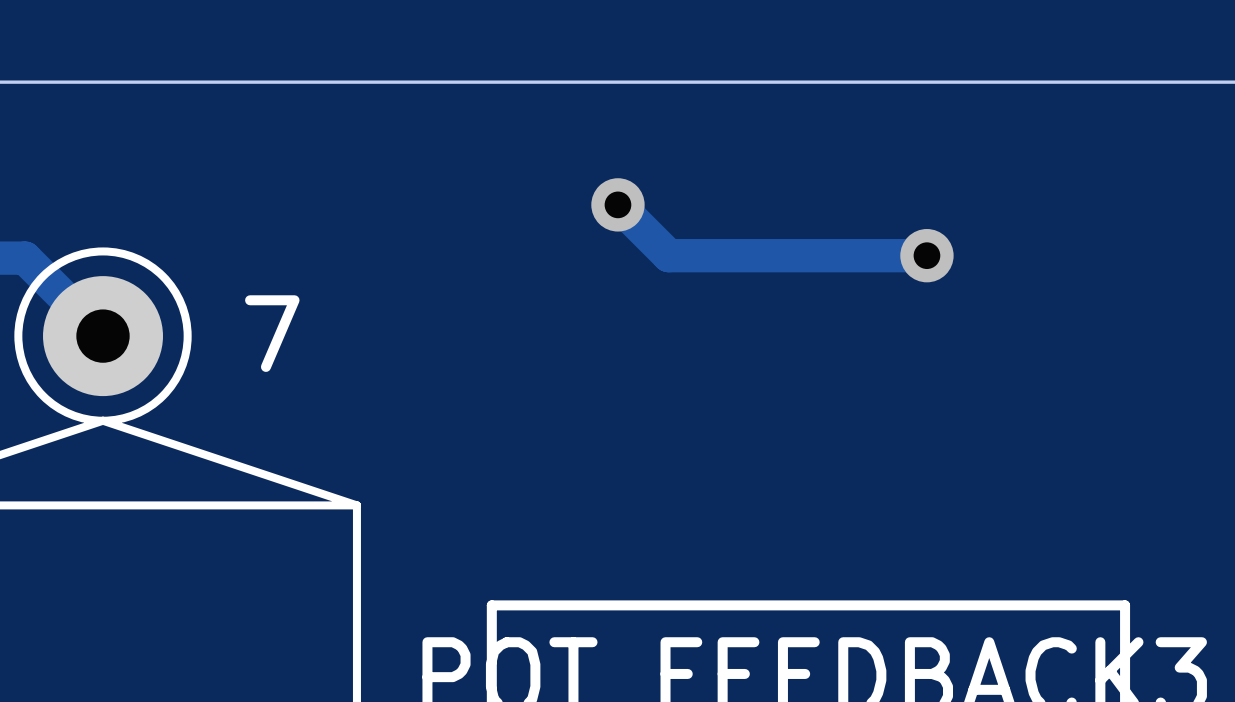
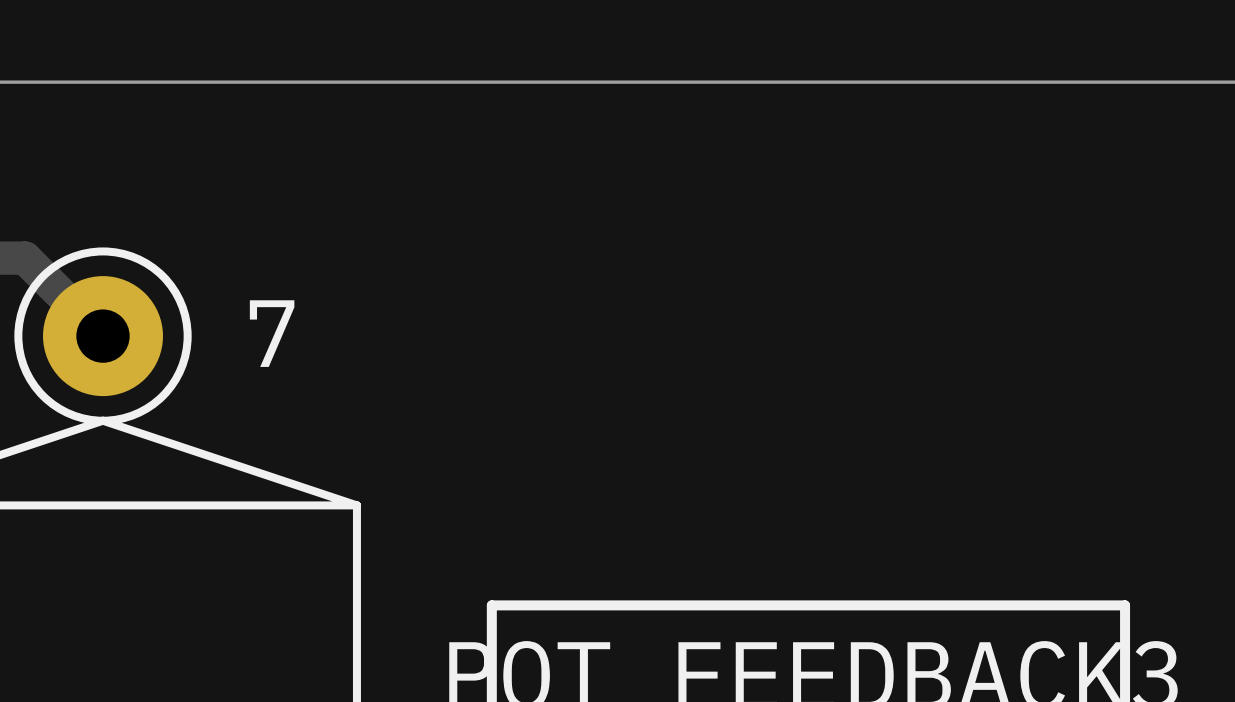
track: (617, 204) (668, 255) (926, 255) -> none
via: (617, 204) -> none
via: (926, 255) -> none

